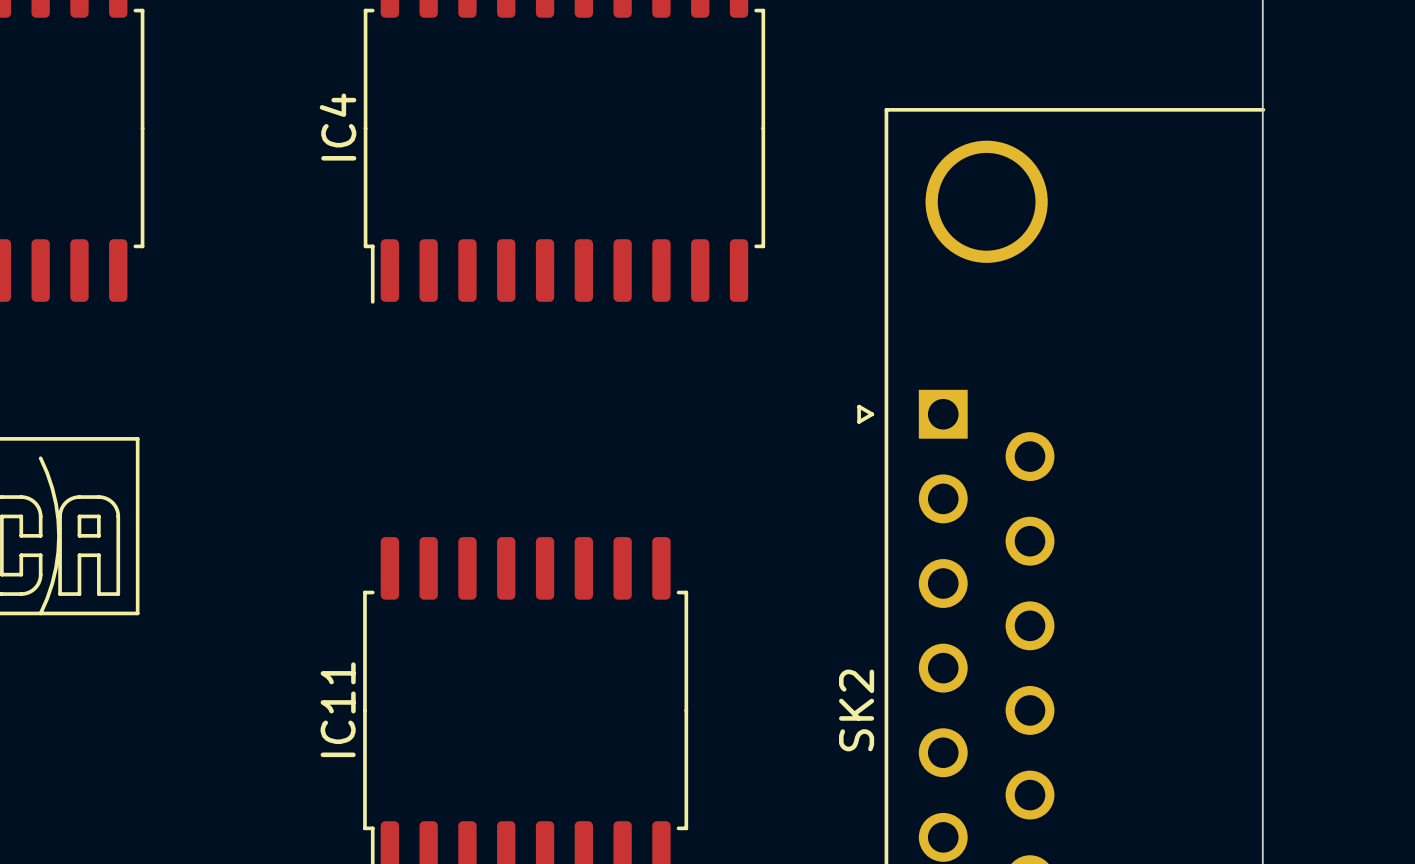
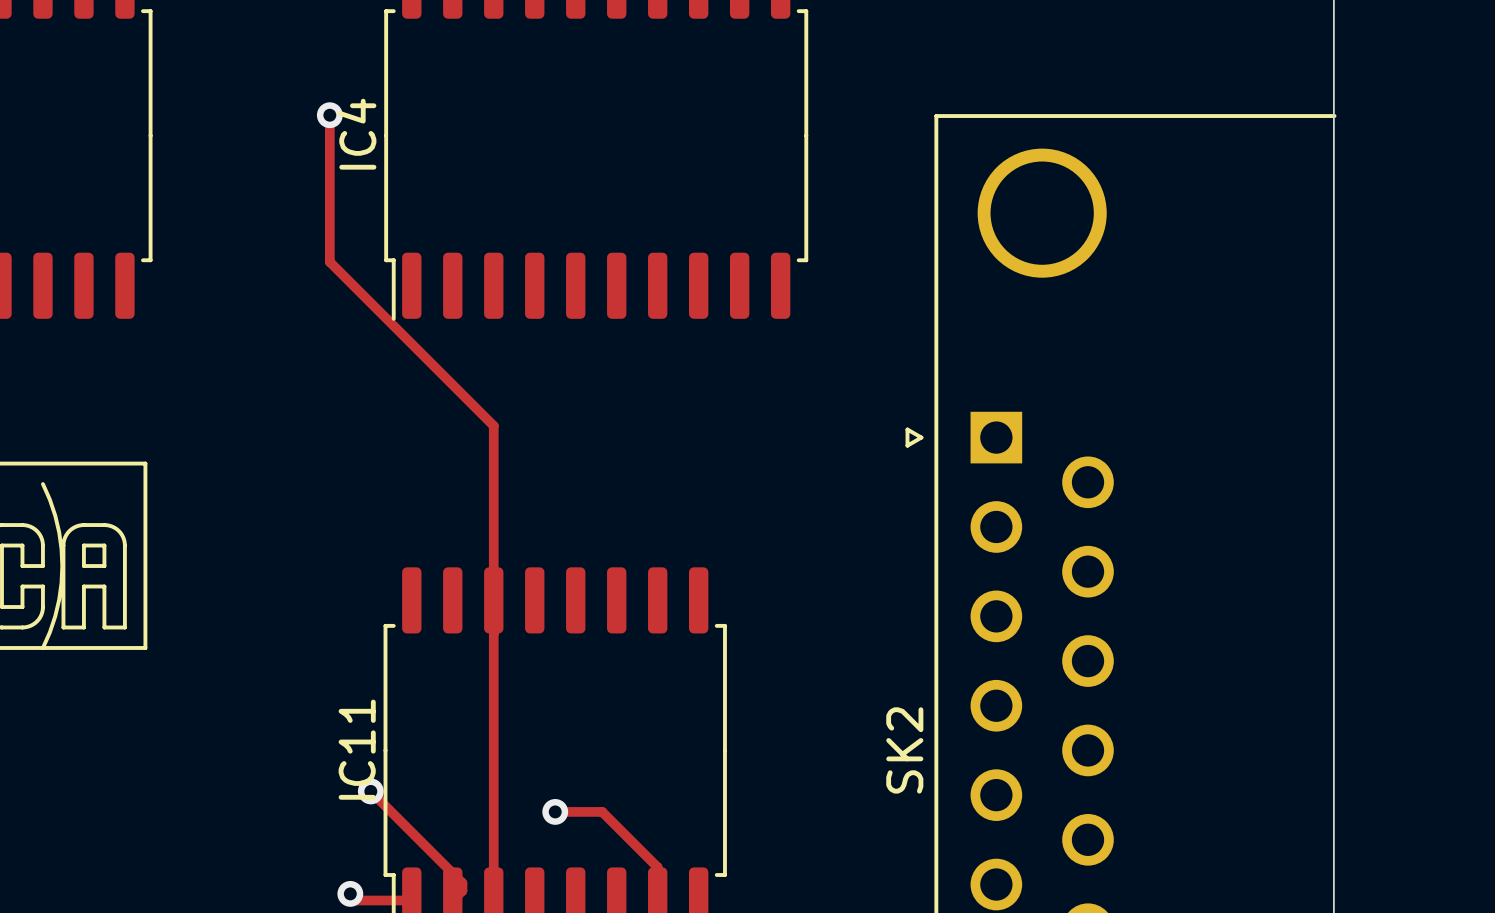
track: none -> (329, 115) (329, 261) (493, 425) (493, 893)
via: none -> (329, 115)
track: none -> (370, 791) (462, 883) (462, 890) (452, 900)
via: none -> (370, 791)
track: none -> (555, 811) (602, 811) (657, 867) (657, 900)
via: none -> (555, 811)
track: none -> (350, 893) (356, 900) (411, 900)
via: none -> (350, 893)

